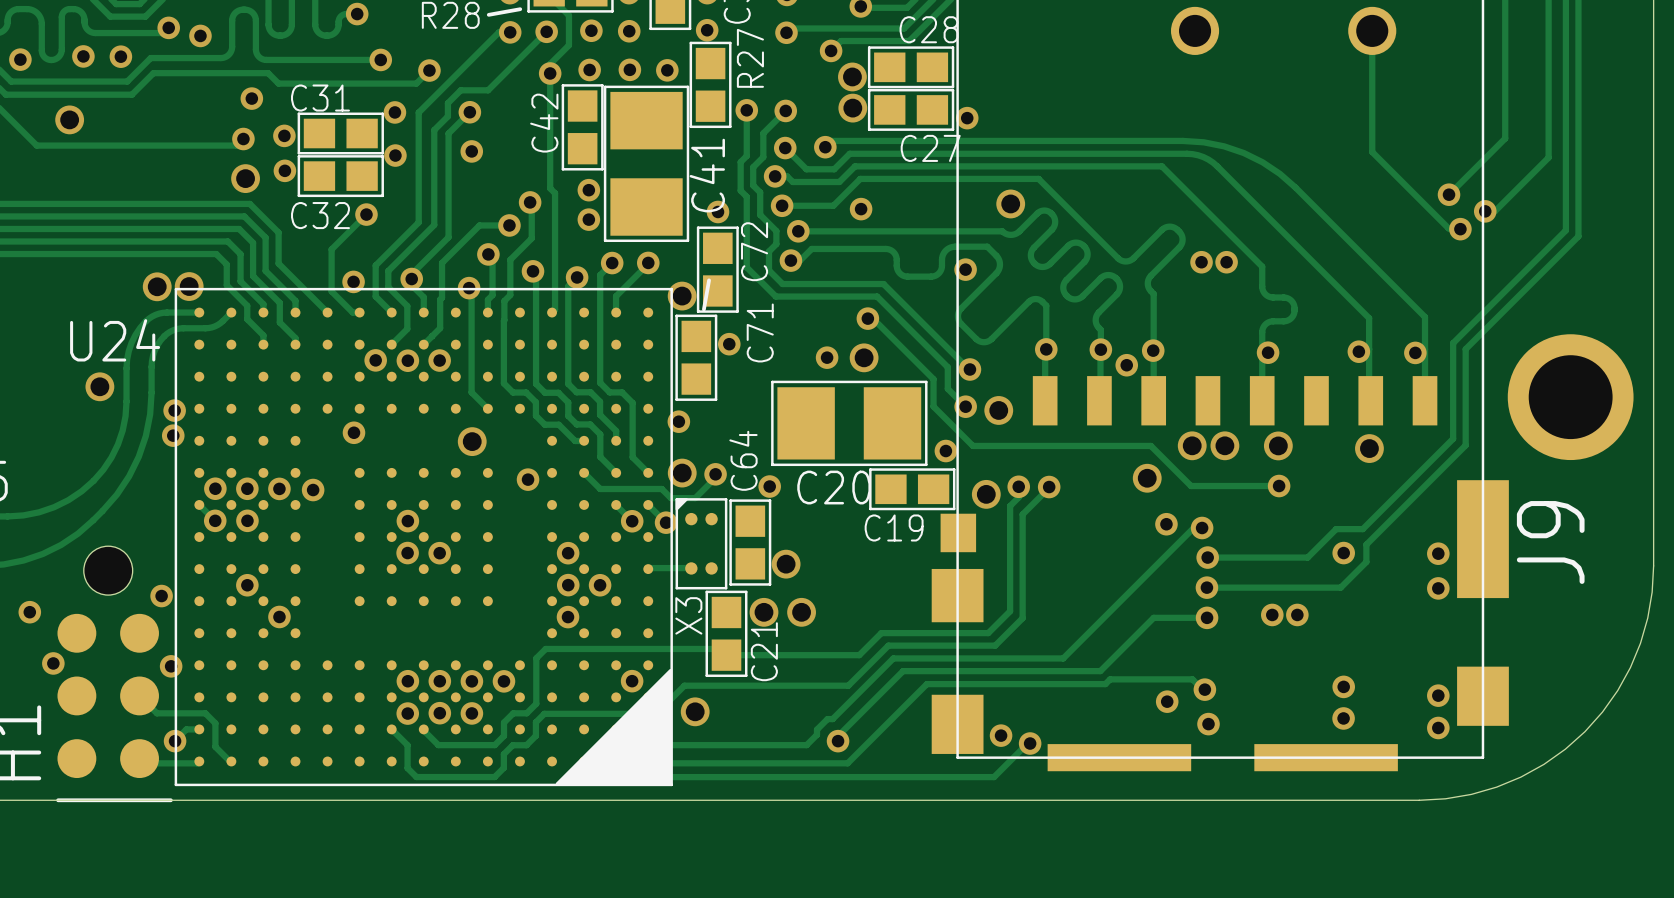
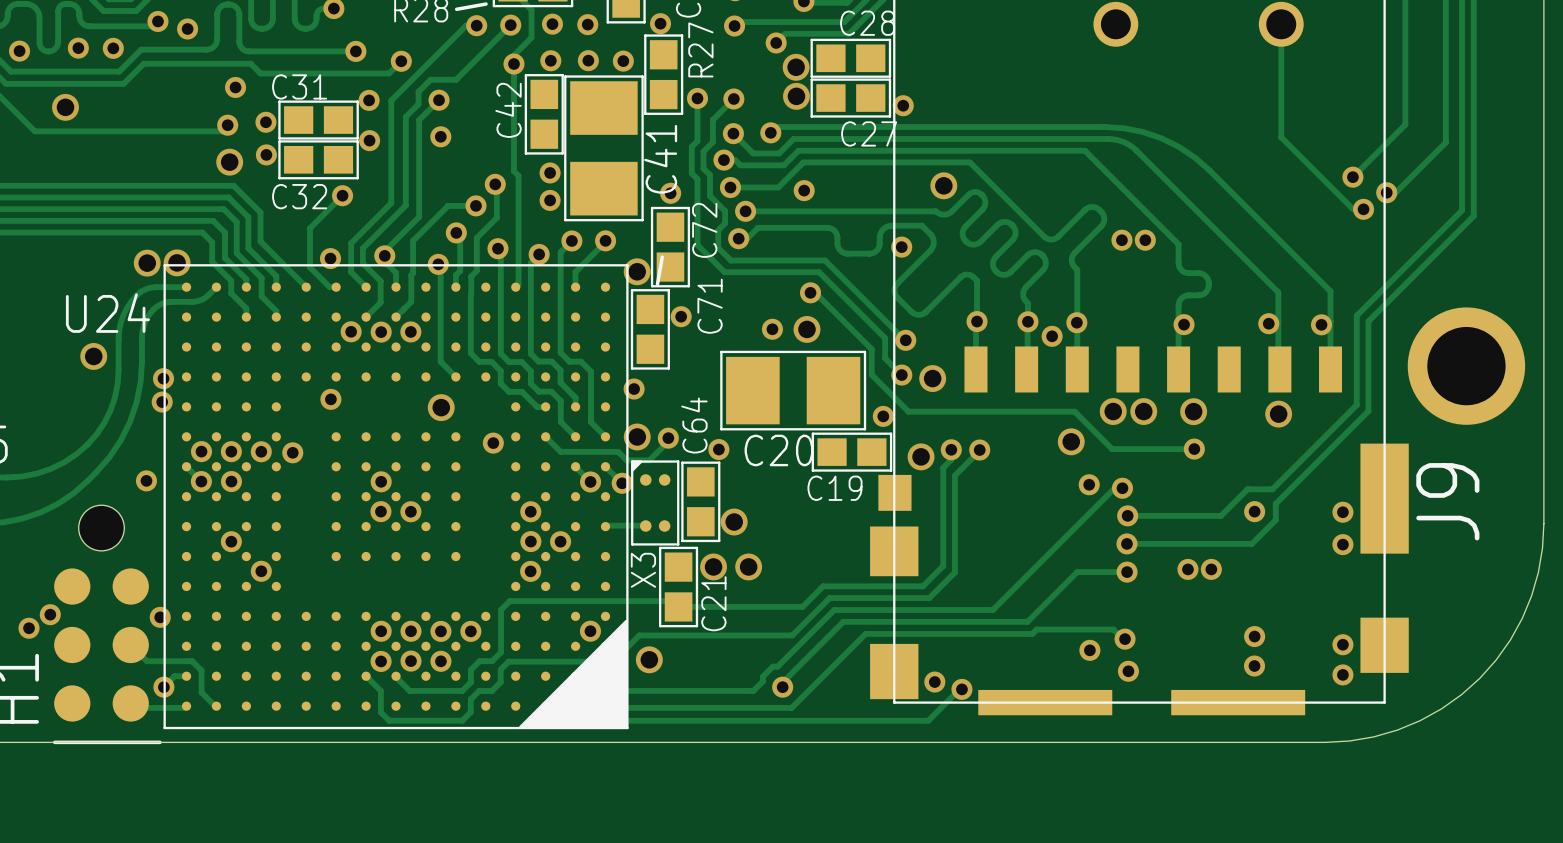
via position: (161, 596) -> (146, 480)
via position: (29, 612) -> (29, 628)

